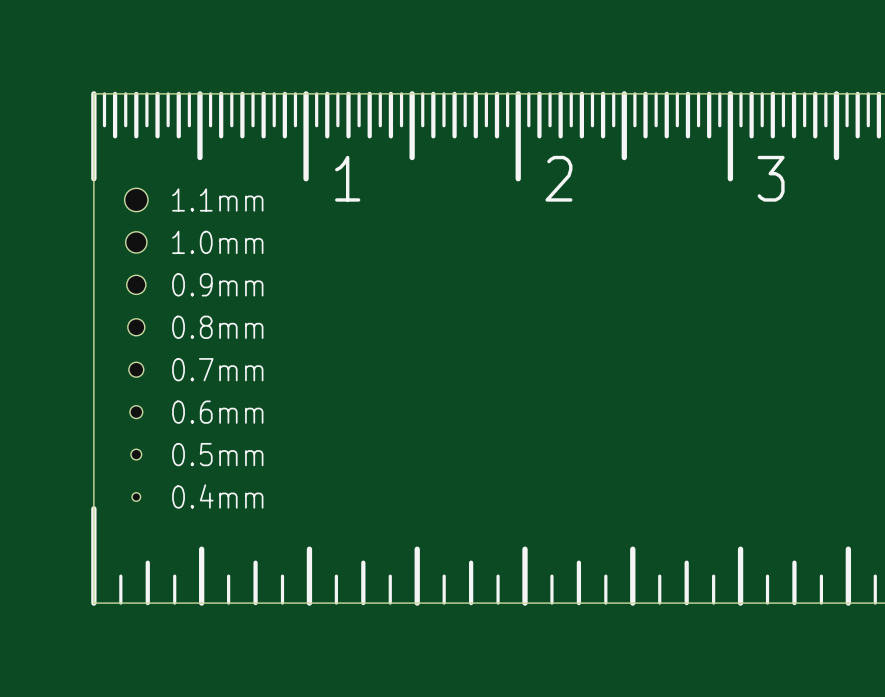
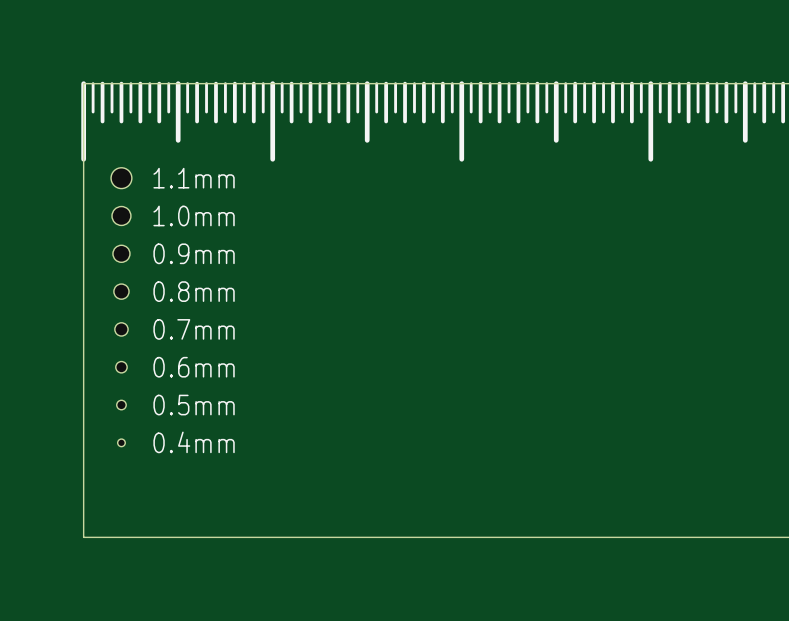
text: 1 (347, 178) -> none
text: 2 (558, 178) -> none
text: 3 (771, 178) -> none
line: (93, 508) (93, 603) -> none
line: (201, 549) (201, 603) -> none
line: (309, 549) (309, 603) -> none
line: (417, 549) (417, 603) -> none
line: (525, 549) (525, 603) -> none
line: (632, 549) (632, 603) -> none
line: (740, 549) (740, 603) -> none
line: (848, 549) (848, 603) -> none
line: (147, 562) (147, 603) -> none
line: (255, 562) (255, 603) -> none
line: (363, 562) (363, 603) -> none
line: (471, 562) (471, 603) -> none
line: (578, 562) (578, 603) -> none
line: (686, 562) (686, 603) -> none
line: (794, 562) (794, 603) -> none
line: (120, 576) (120, 603) -> none
line: (174, 576) (174, 603) -> none
line: (228, 576) (228, 603) -> none
line: (282, 576) (282, 603) -> none
line: (336, 576) (336, 603) -> none
line: (390, 576) (390, 603) -> none
line: (444, 576) (444, 603) -> none
line: (498, 576) (498, 603) -> none
line: (551, 576) (551, 603) -> none
line: (605, 576) (605, 603) -> none
line: (659, 576) (659, 603) -> none
line: (713, 576) (713, 603) -> none
line: (767, 576) (767, 603) -> none
line: (821, 576) (821, 603) -> none
line: (875, 576) (875, 603) -> none

